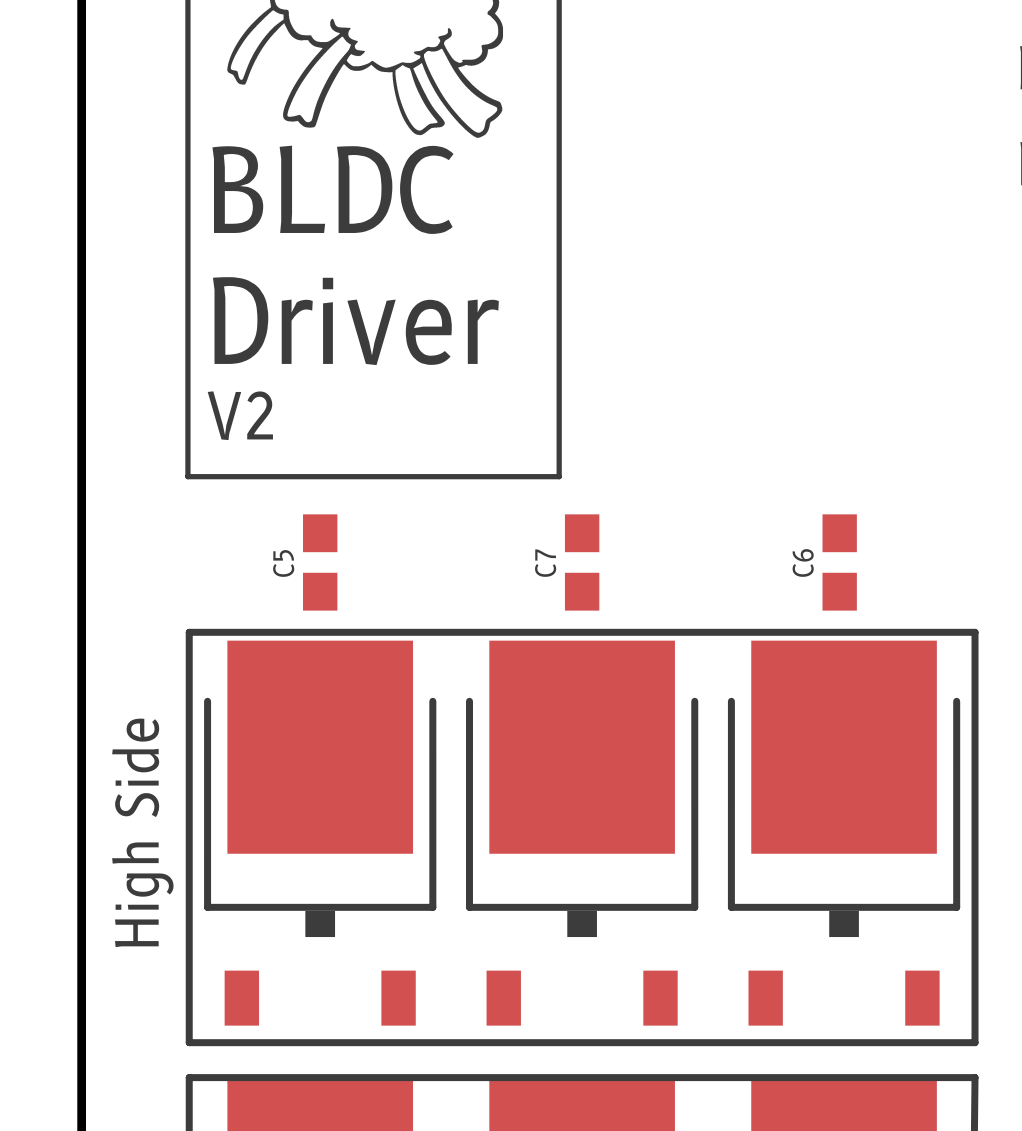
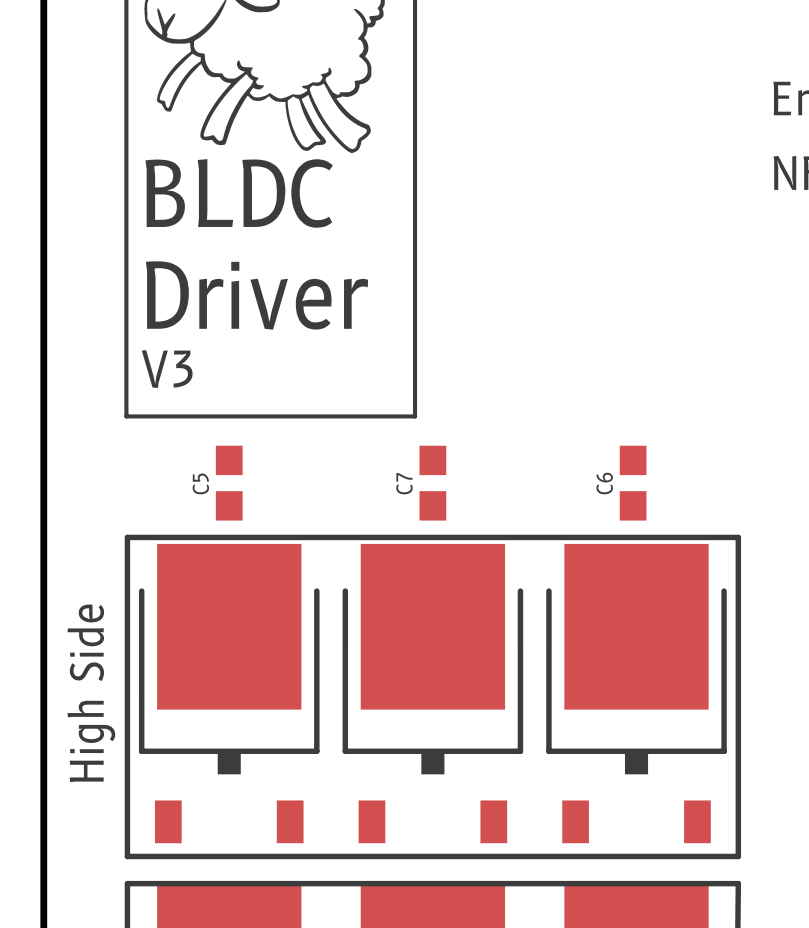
text: V2 (240, 415) -> V3 (167, 369)

